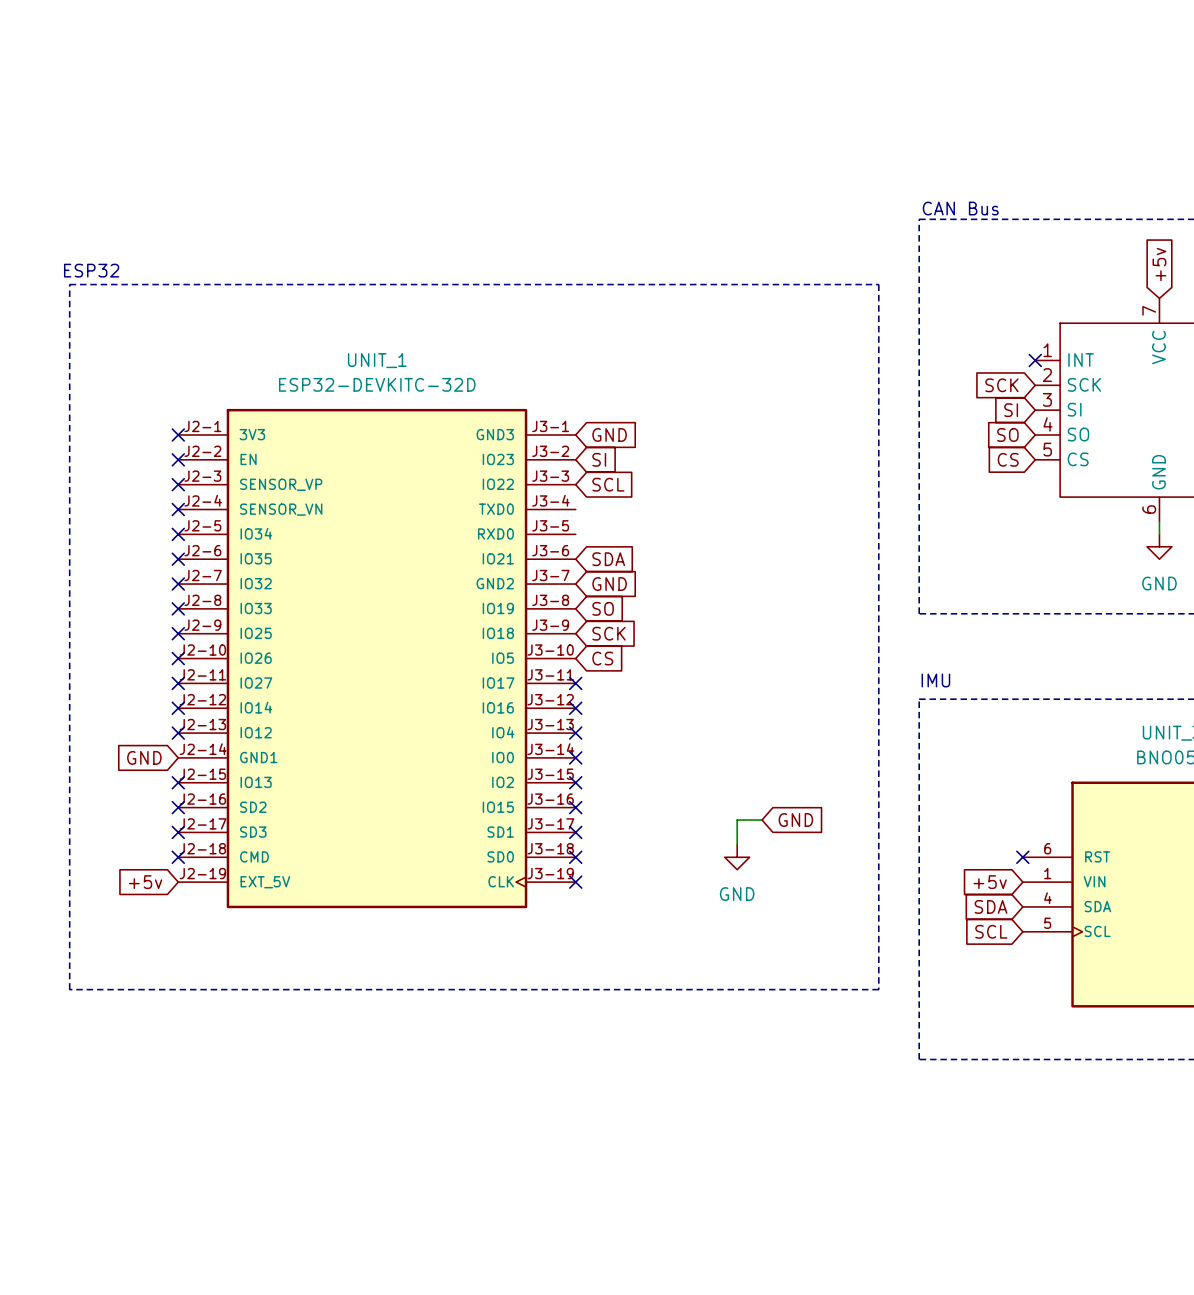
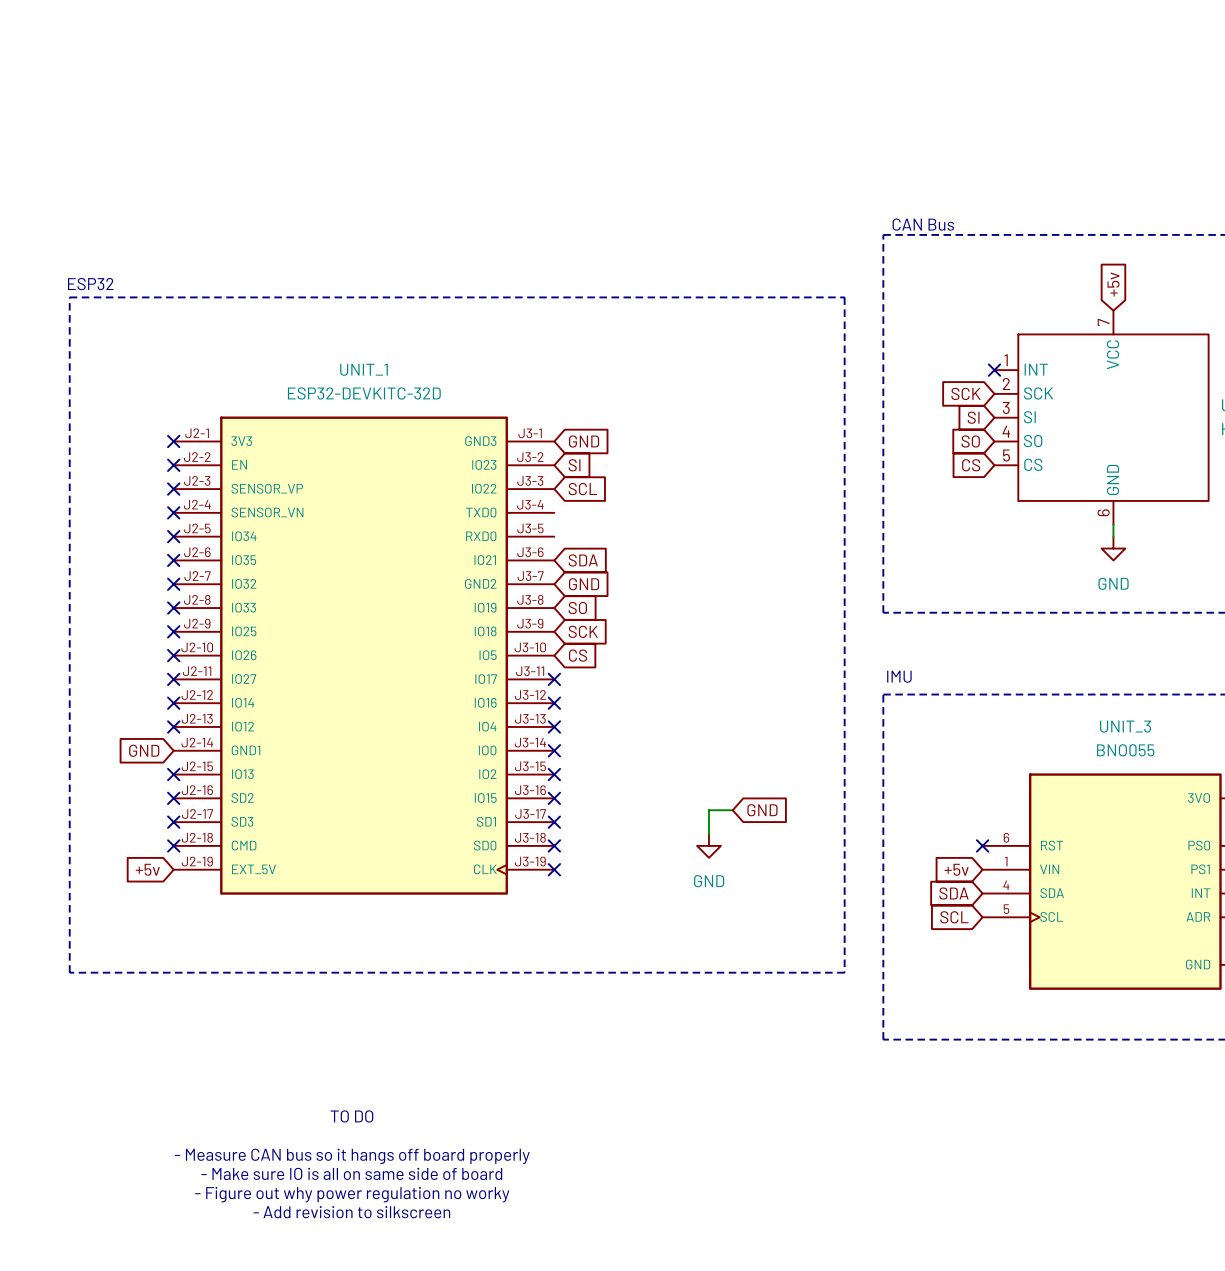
text: none -> TO DO (351, 1116)
text: none -> - Measure CAN bus so it hangs off board properly (352, 1156)
text: none -> - Make sure IO is all on same side of board (351, 1173)
text: none -> - Figure out why power regulation no worky (352, 1194)
text: none -> - Add revision to silkscreen (351, 1212)

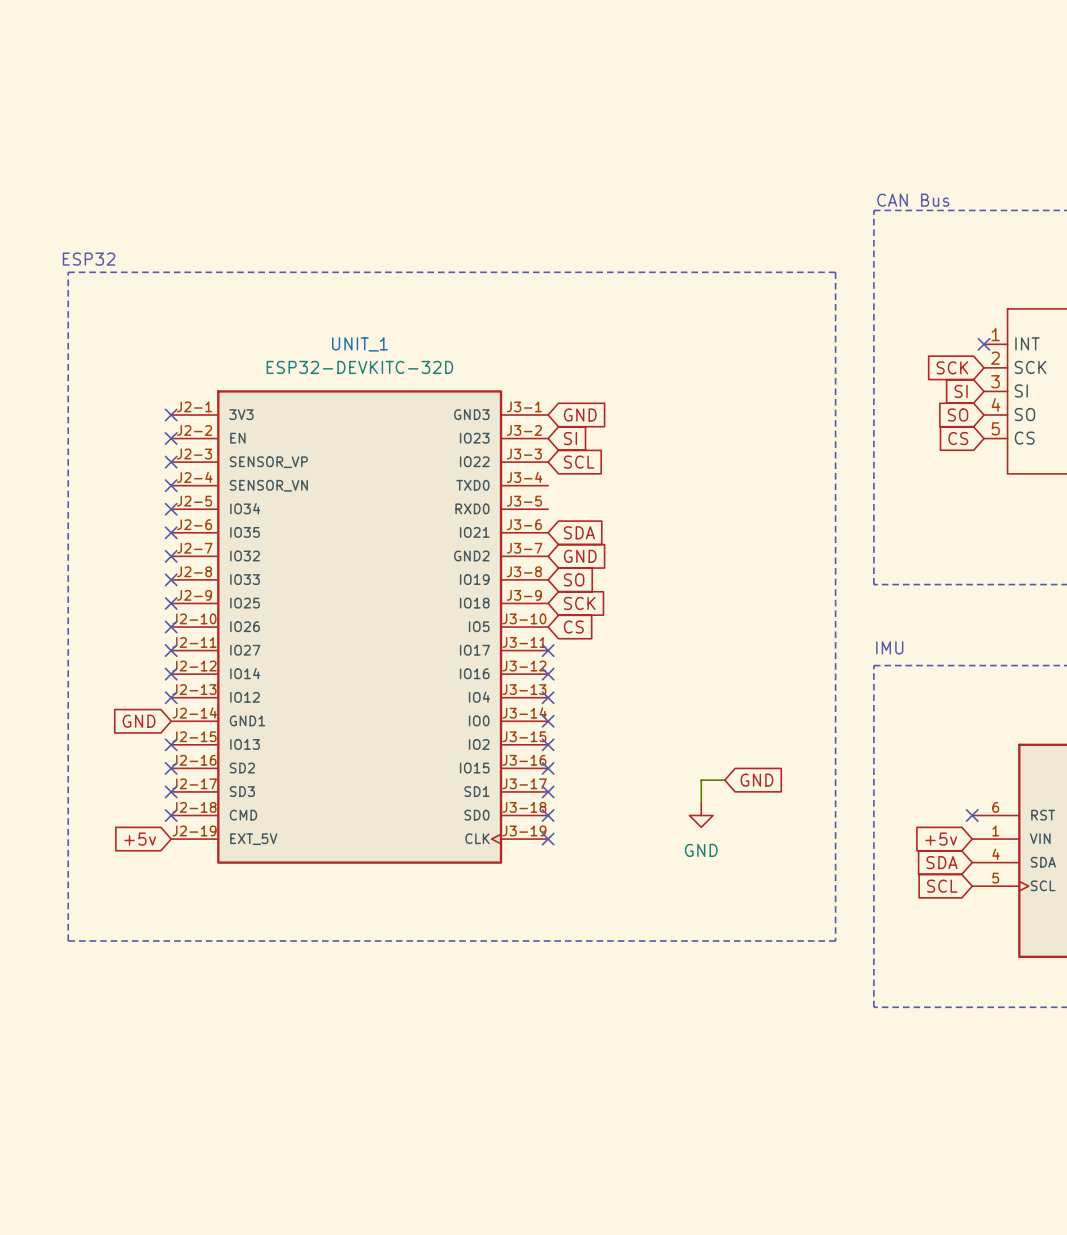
text: TO DO (351, 1116) -> none
text: - Measure CAN bus so it hangs off board properly (352, 1156) -> none
text: - Make sure IO is all on same side of board (351, 1173) -> none
text: - Figure out why power regulation no worky (352, 1194) -> none
text: - Add revision to silkscreen (351, 1212) -> none

